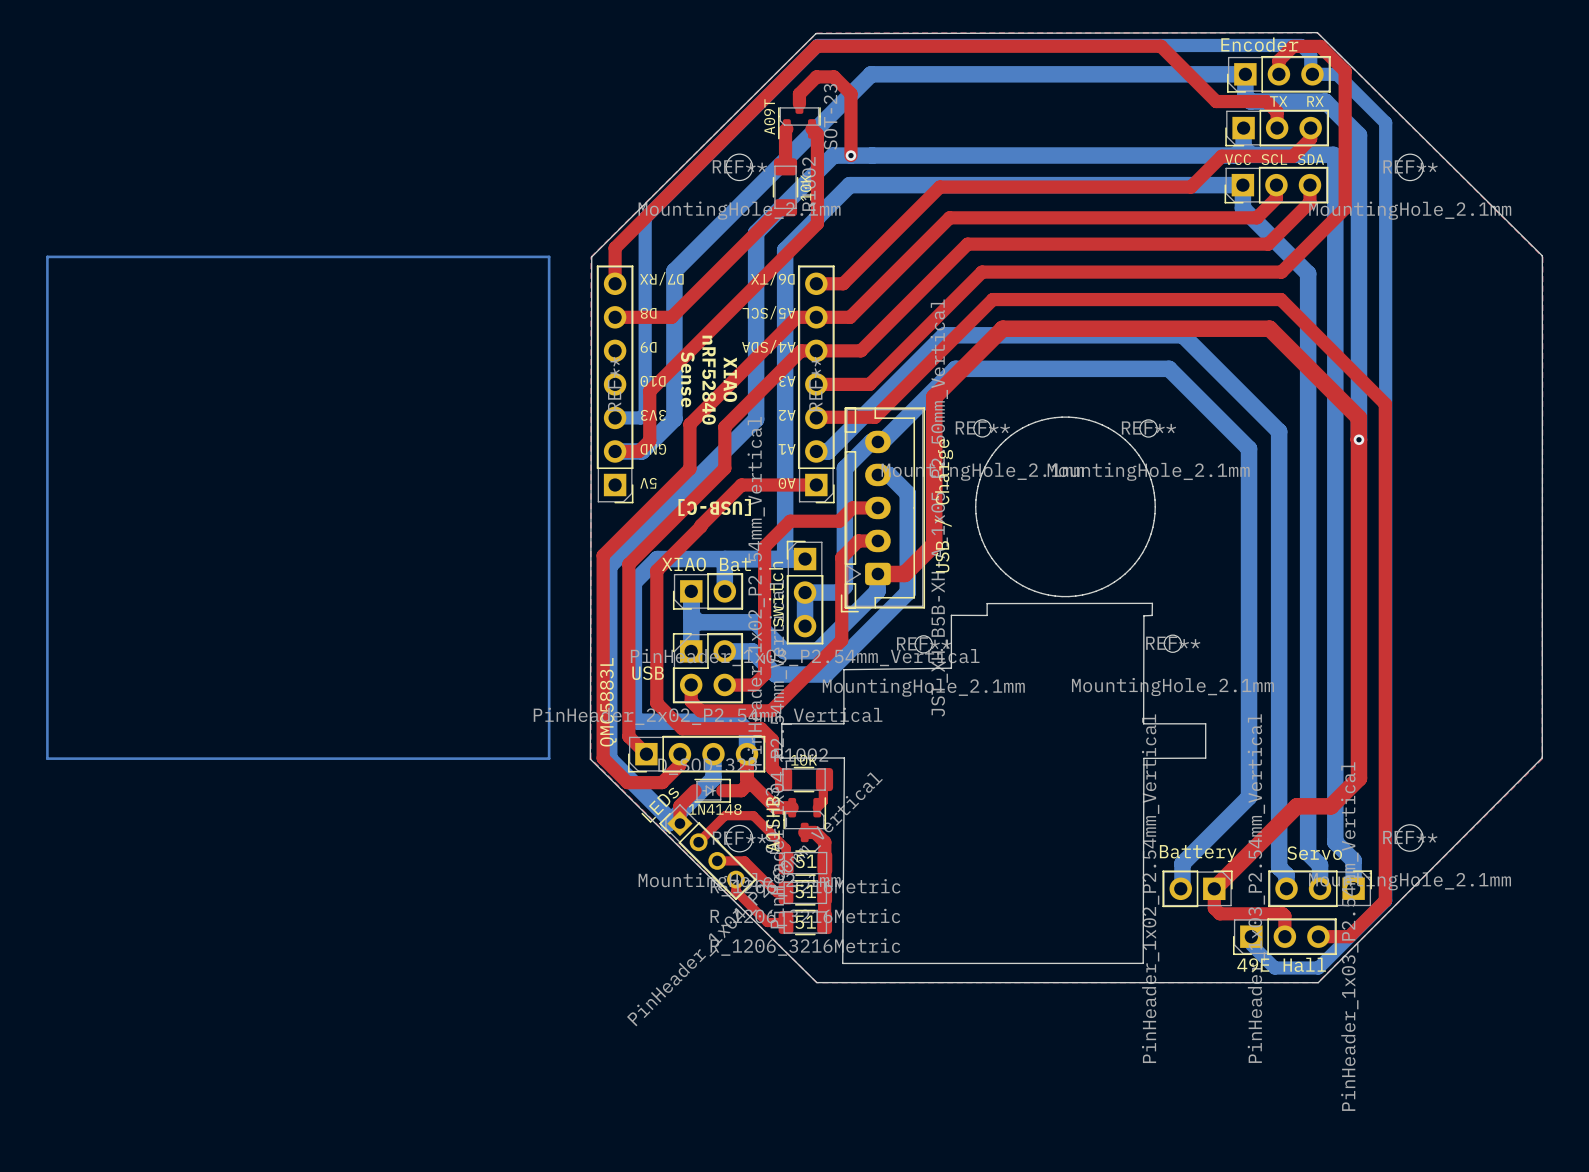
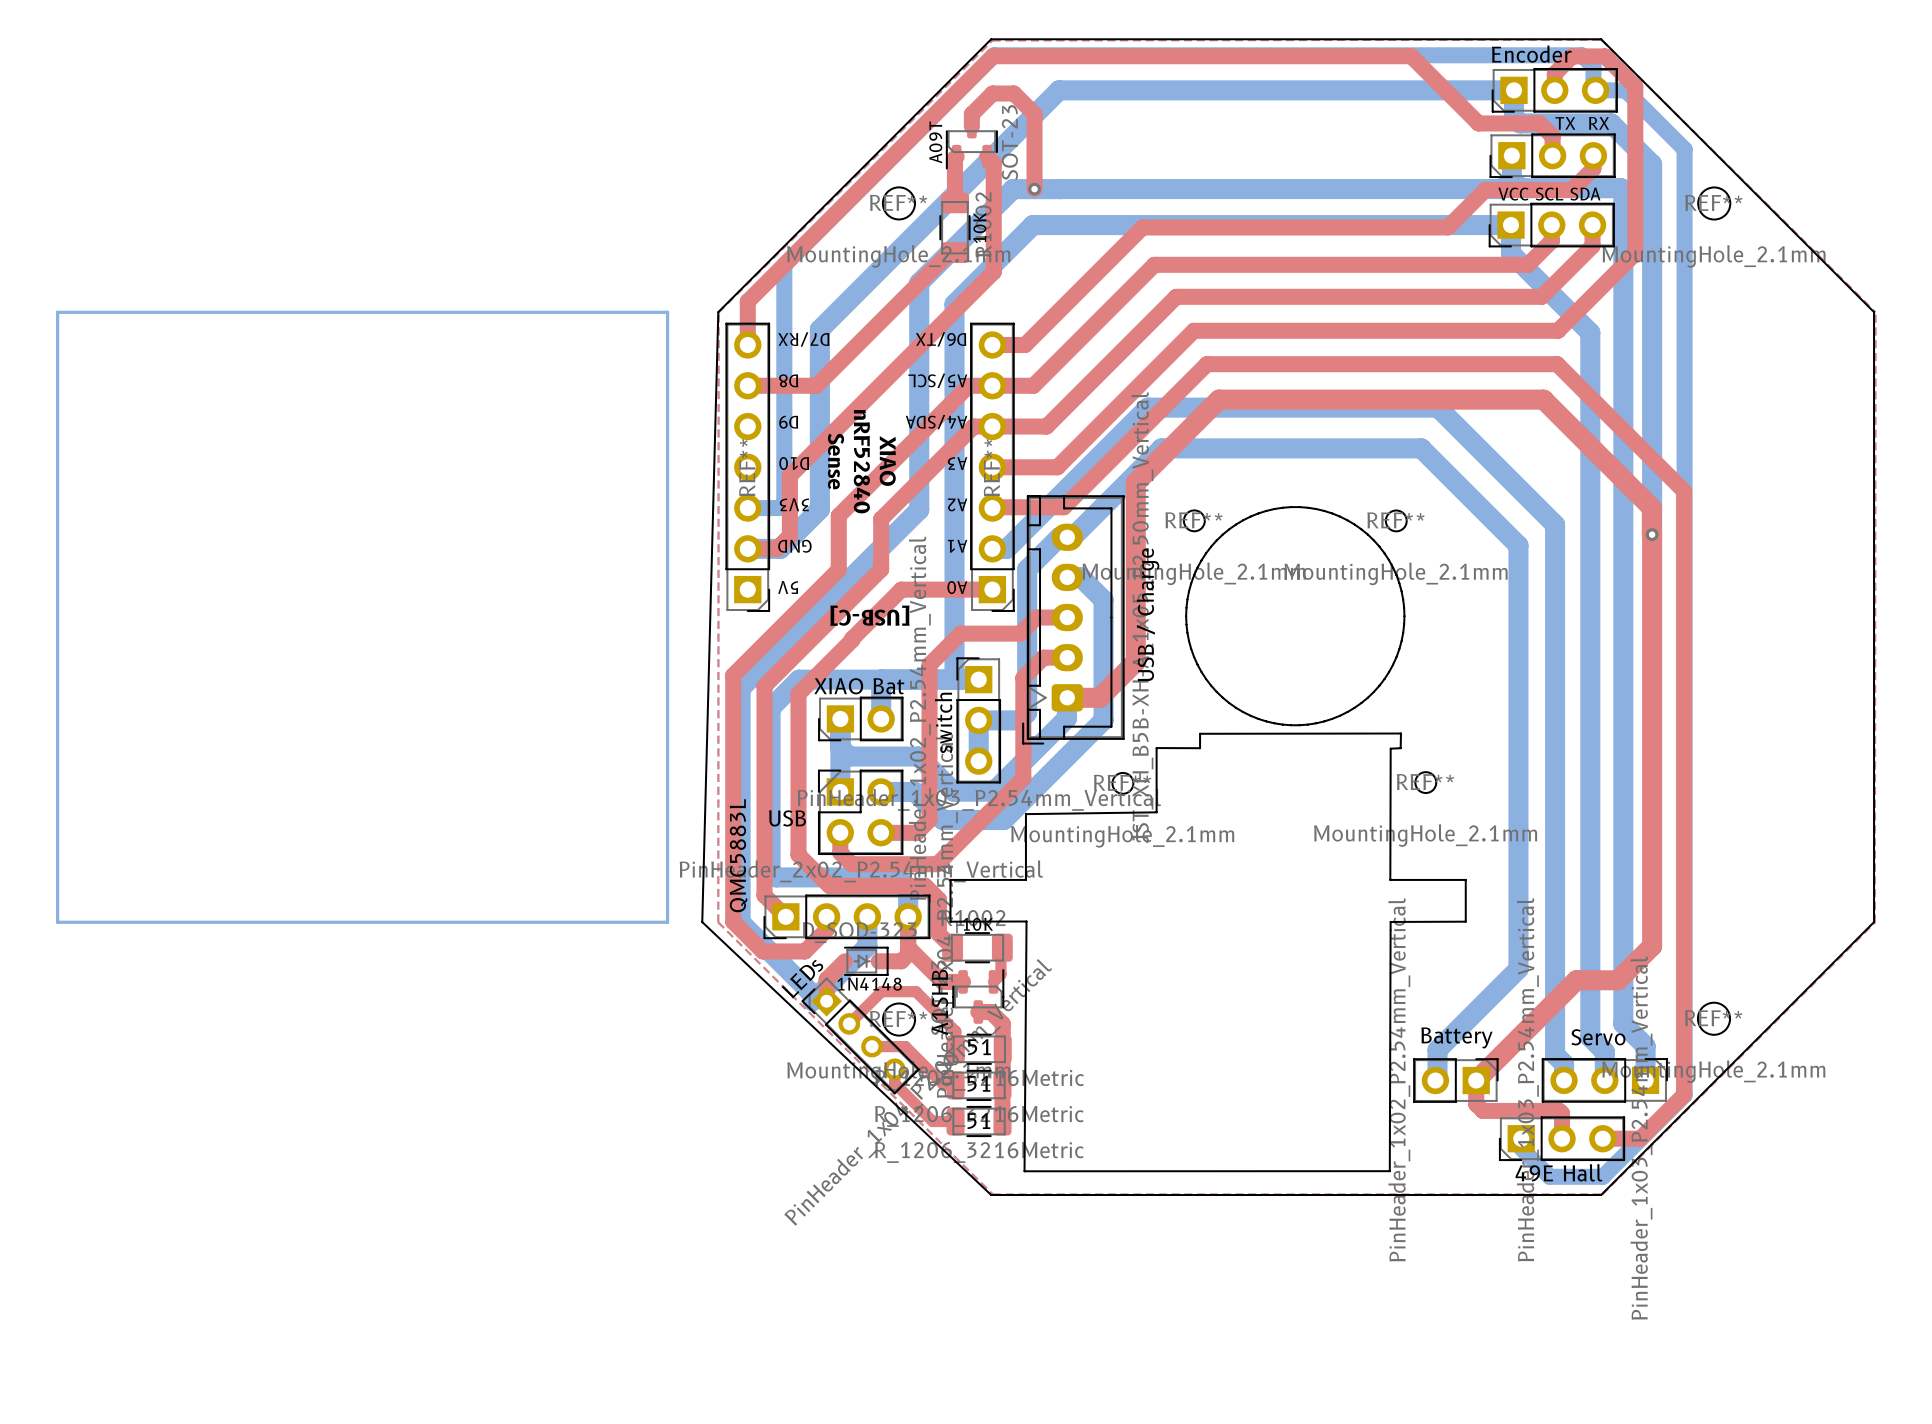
board edge: (1317, 32) (815, 33) (591, 256) (590, 759) (816, 982) (1318, 982) (1542, 757) (1542, 255) (1317, 32) -> (991, 39) (718, 312) (702, 922) (991, 1195) (1601, 1195) (1874, 922) (1874, 312) (1601, 39) (991, 39)

